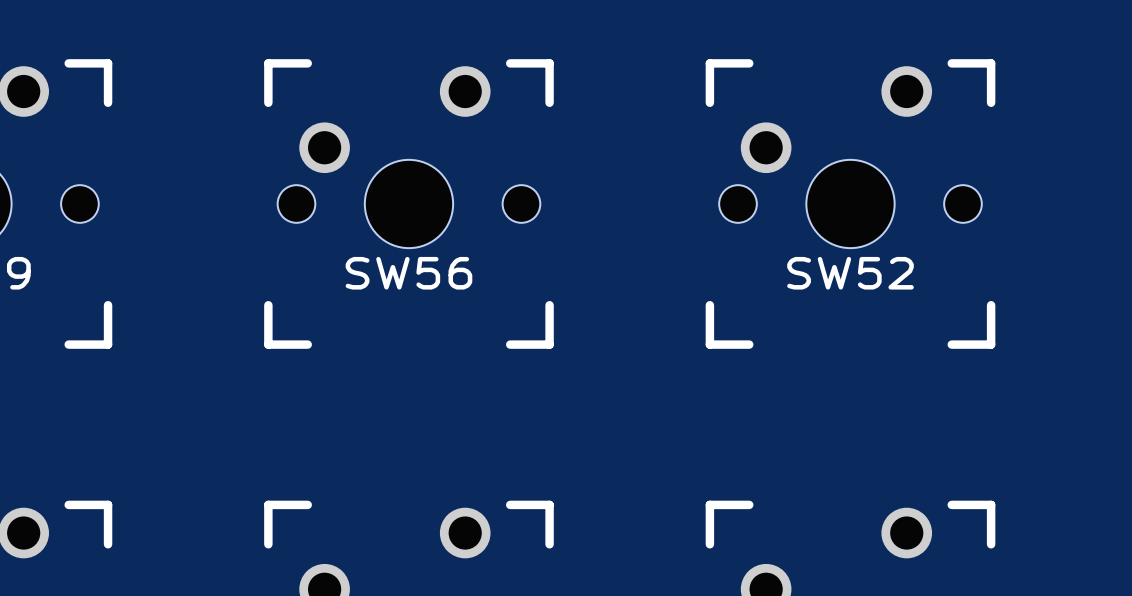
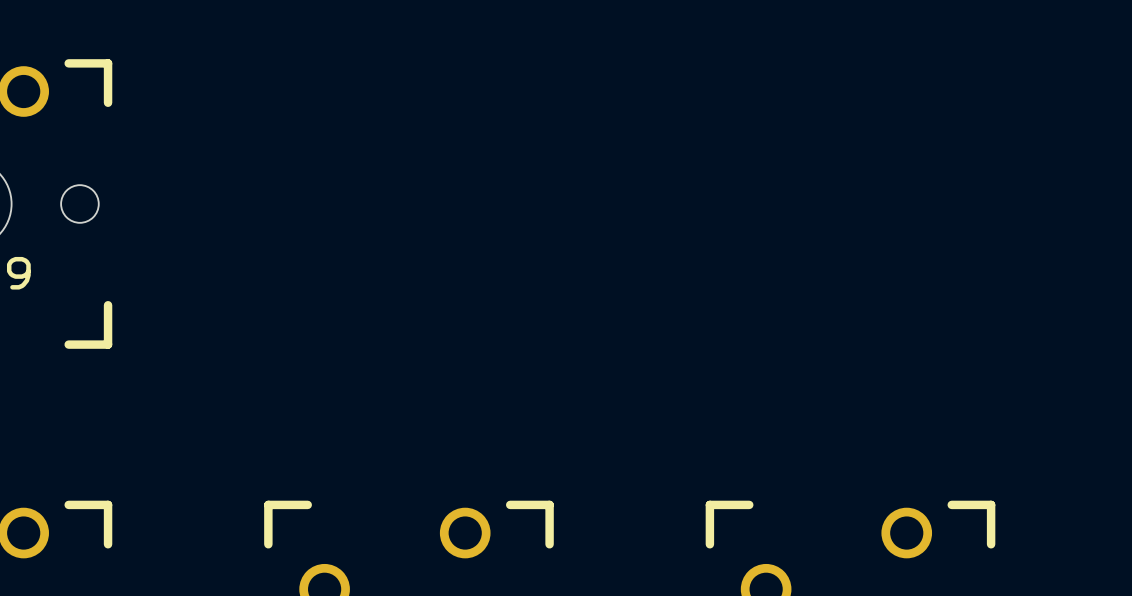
SW56: (408, 203) -> none
SW52: (850, 203) -> none

